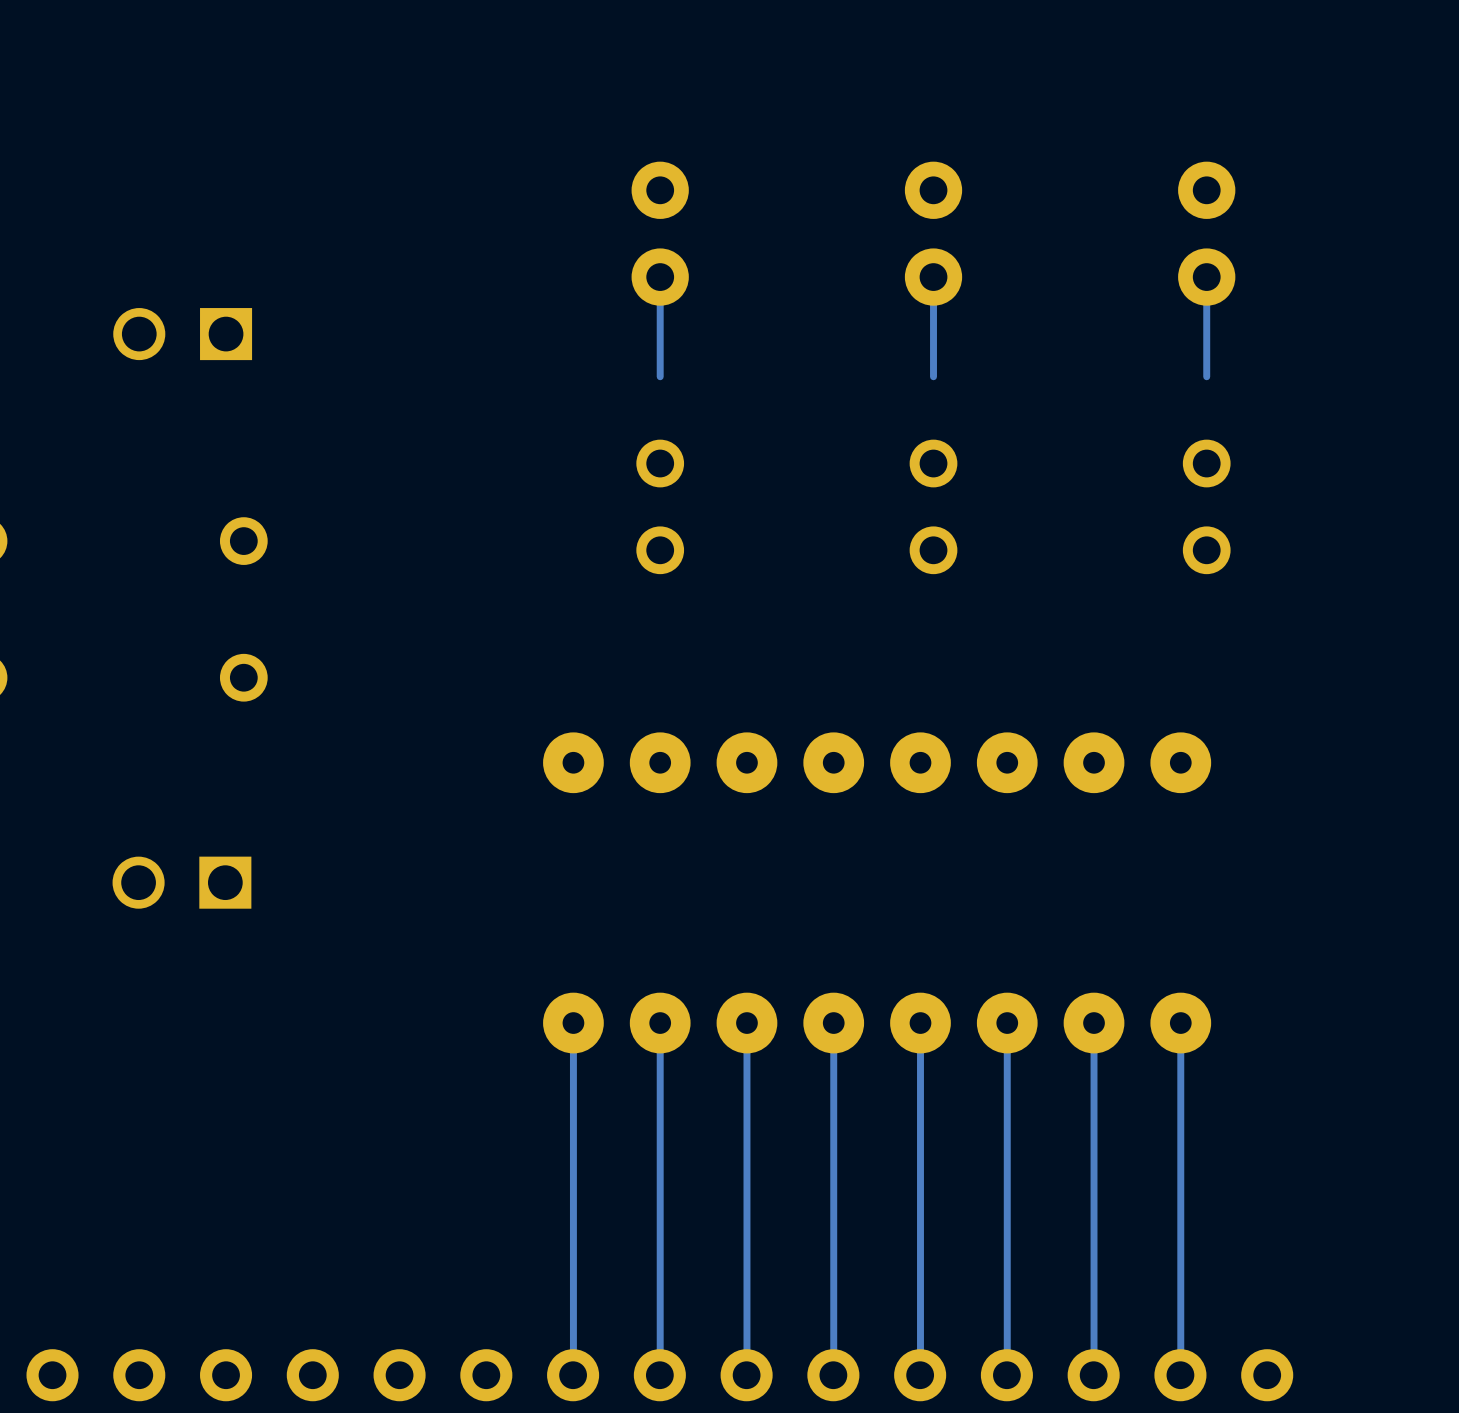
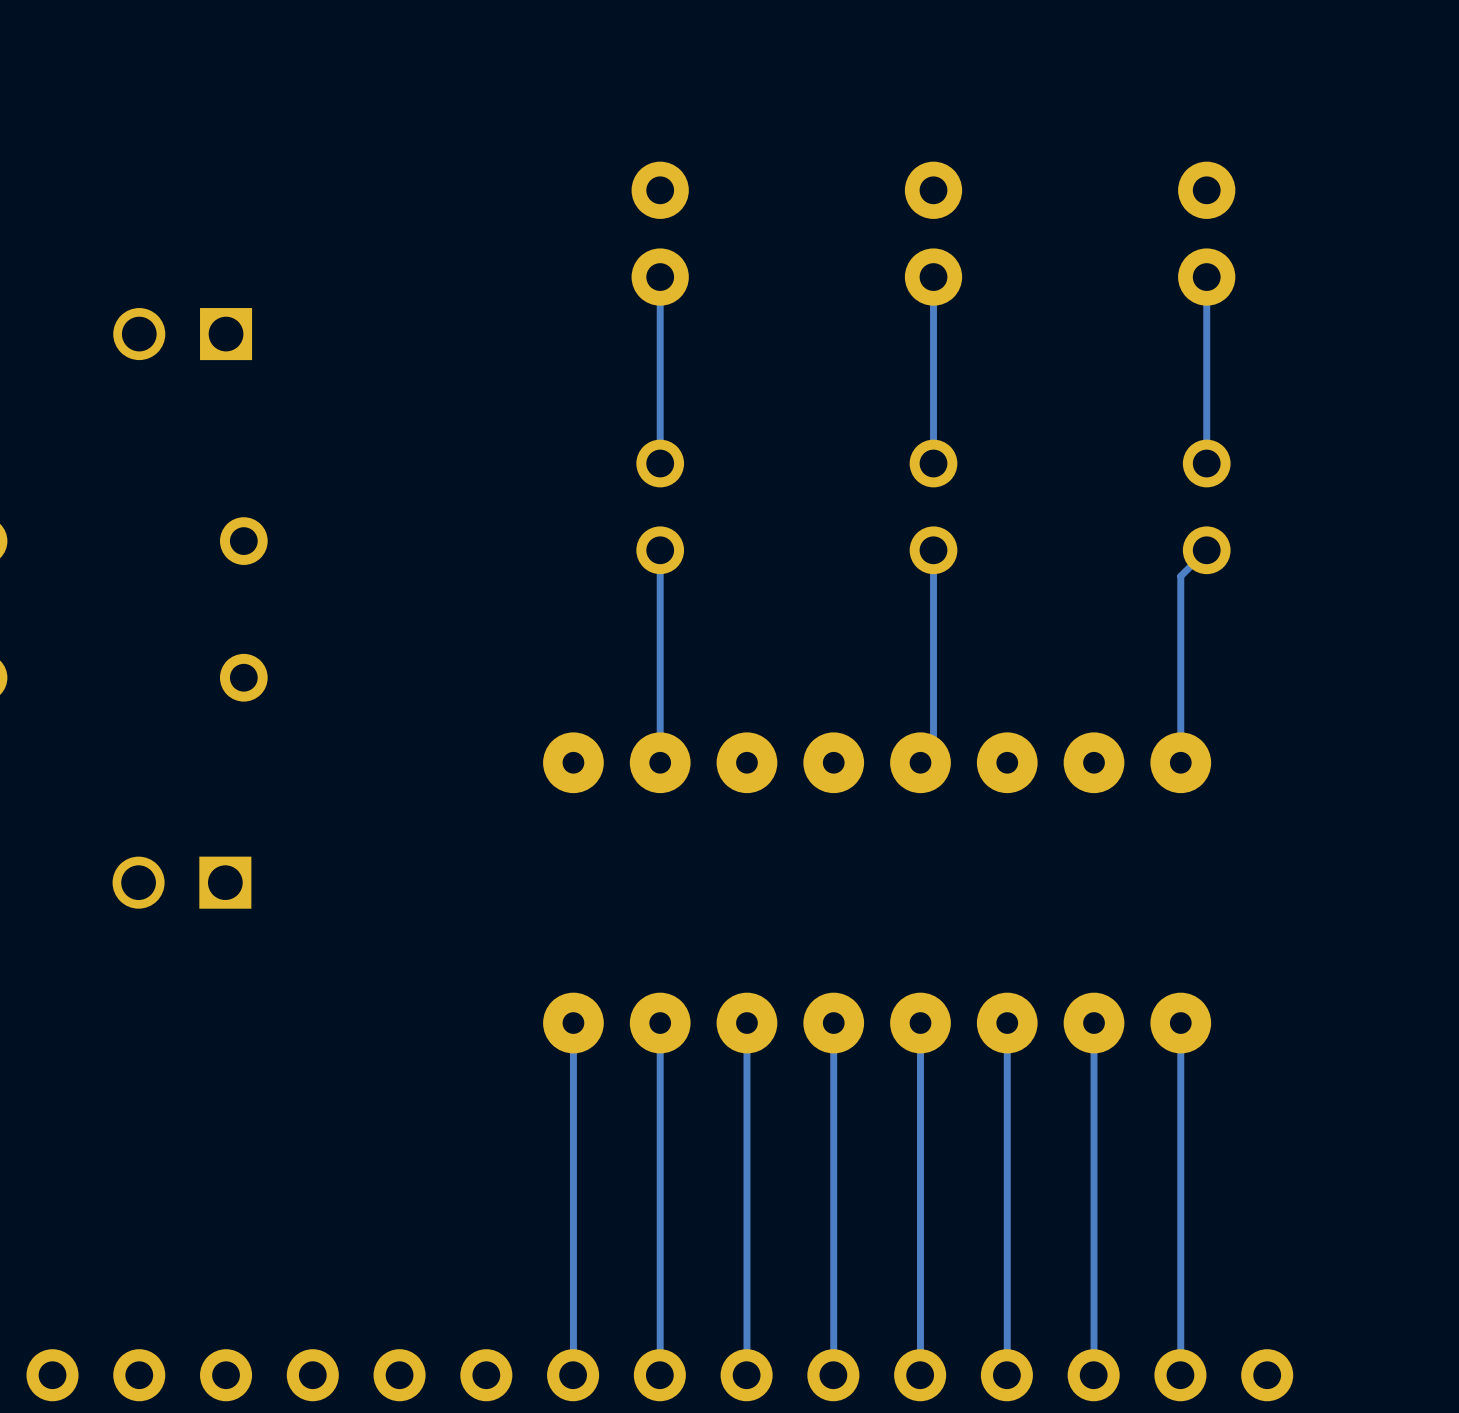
track: none -> (660, 376) (660, 463)
track: none -> (933, 376) (933, 463)
track: none -> (1206, 376) (1206, 463)
track: none -> (660, 550) (660, 762)
track: none -> (933, 550) (933, 749) (920, 762)
track: none -> (1206, 550) (1180, 576) (1180, 762)

